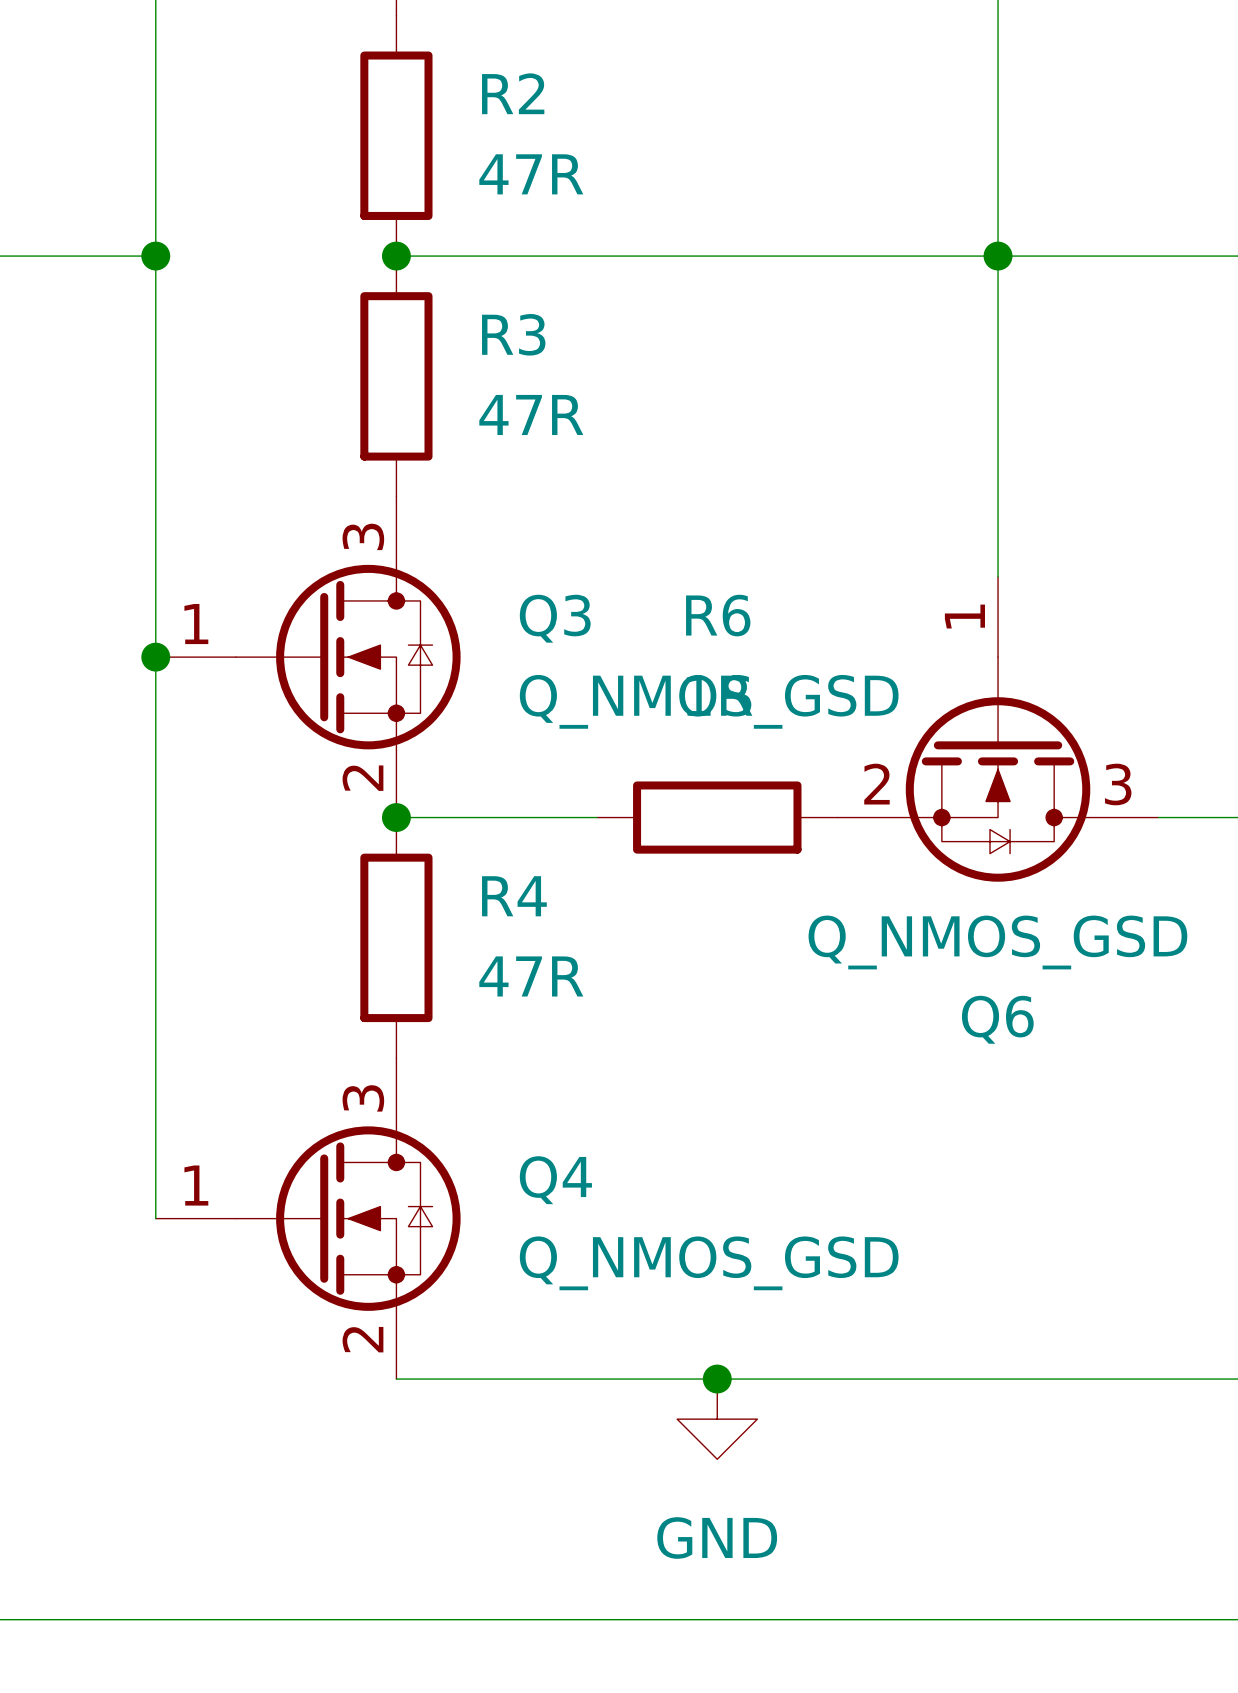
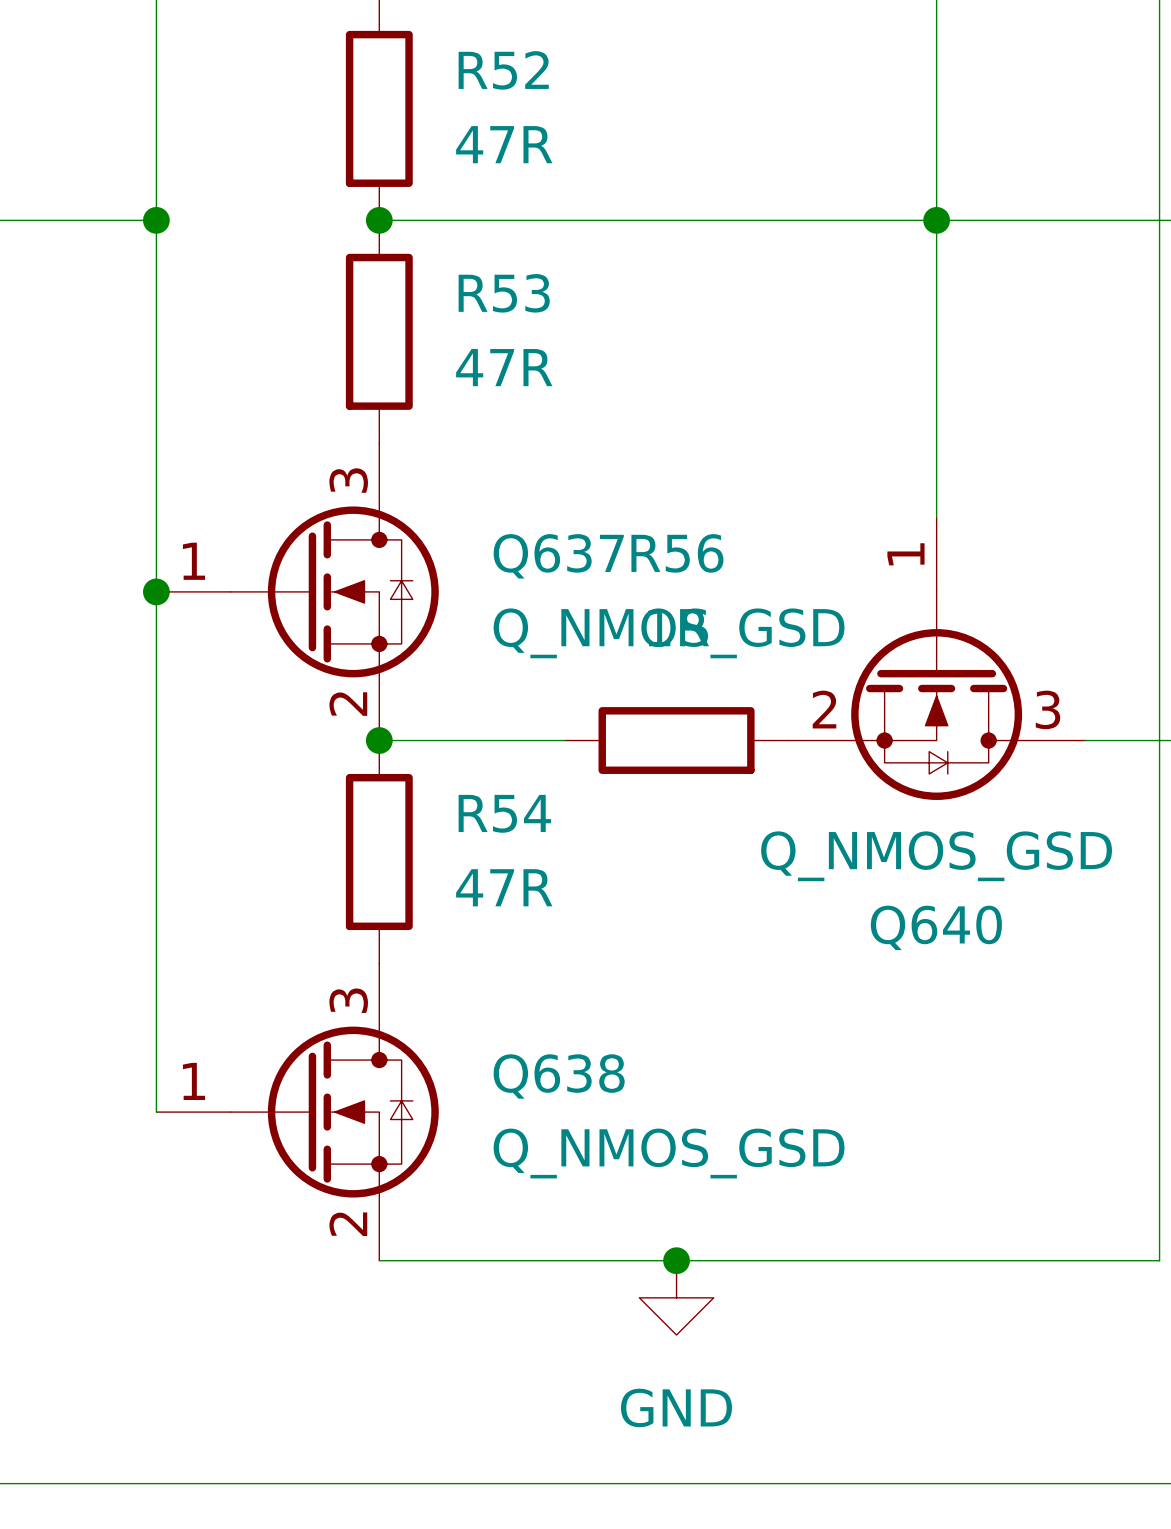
R2 name: R2 (513, 93) -> R52 (503, 70)
R3 name: R3 (513, 334) -> R53 (504, 293)
R6 name: R6 (718, 615) -> R56 (677, 553)
Q3 name: Q3 (555, 618) -> Q637 (558, 556)
R4 name: R4 (514, 896) -> R54 (504, 813)
Q6 name: Q6 (997, 1019) -> Q640 (936, 927)
Q4 name: Q4 (555, 1180) -> Q638 (559, 1076)

